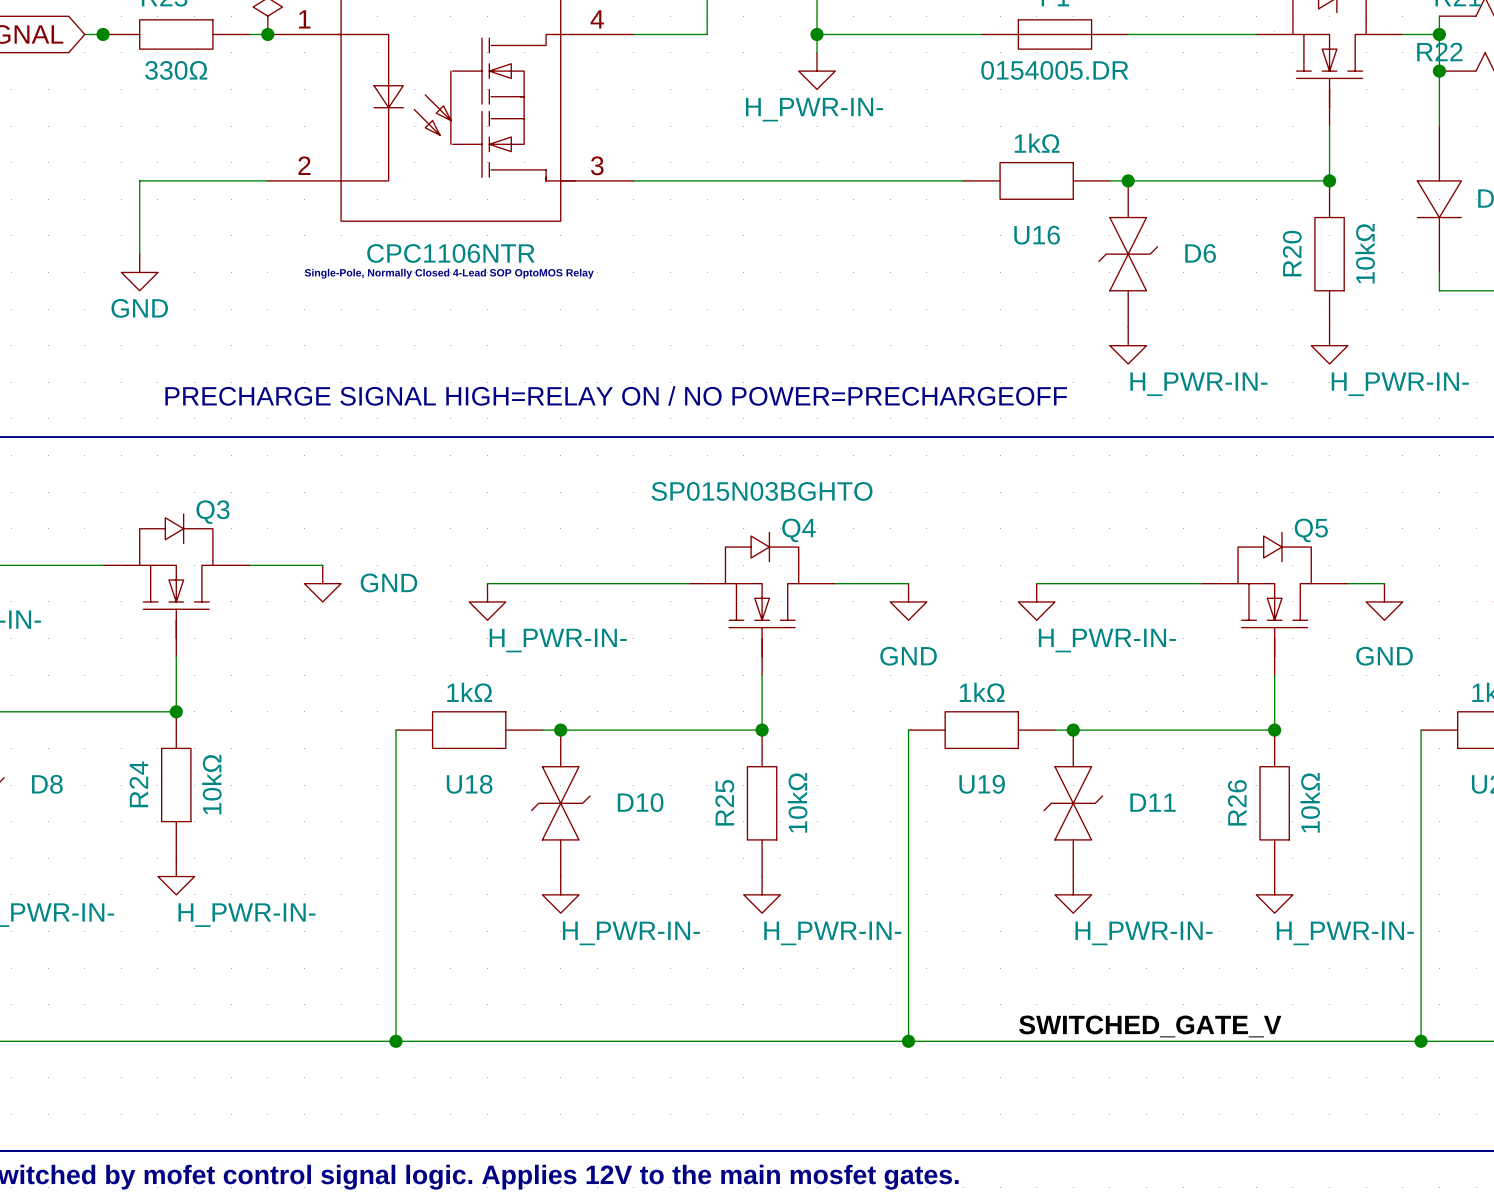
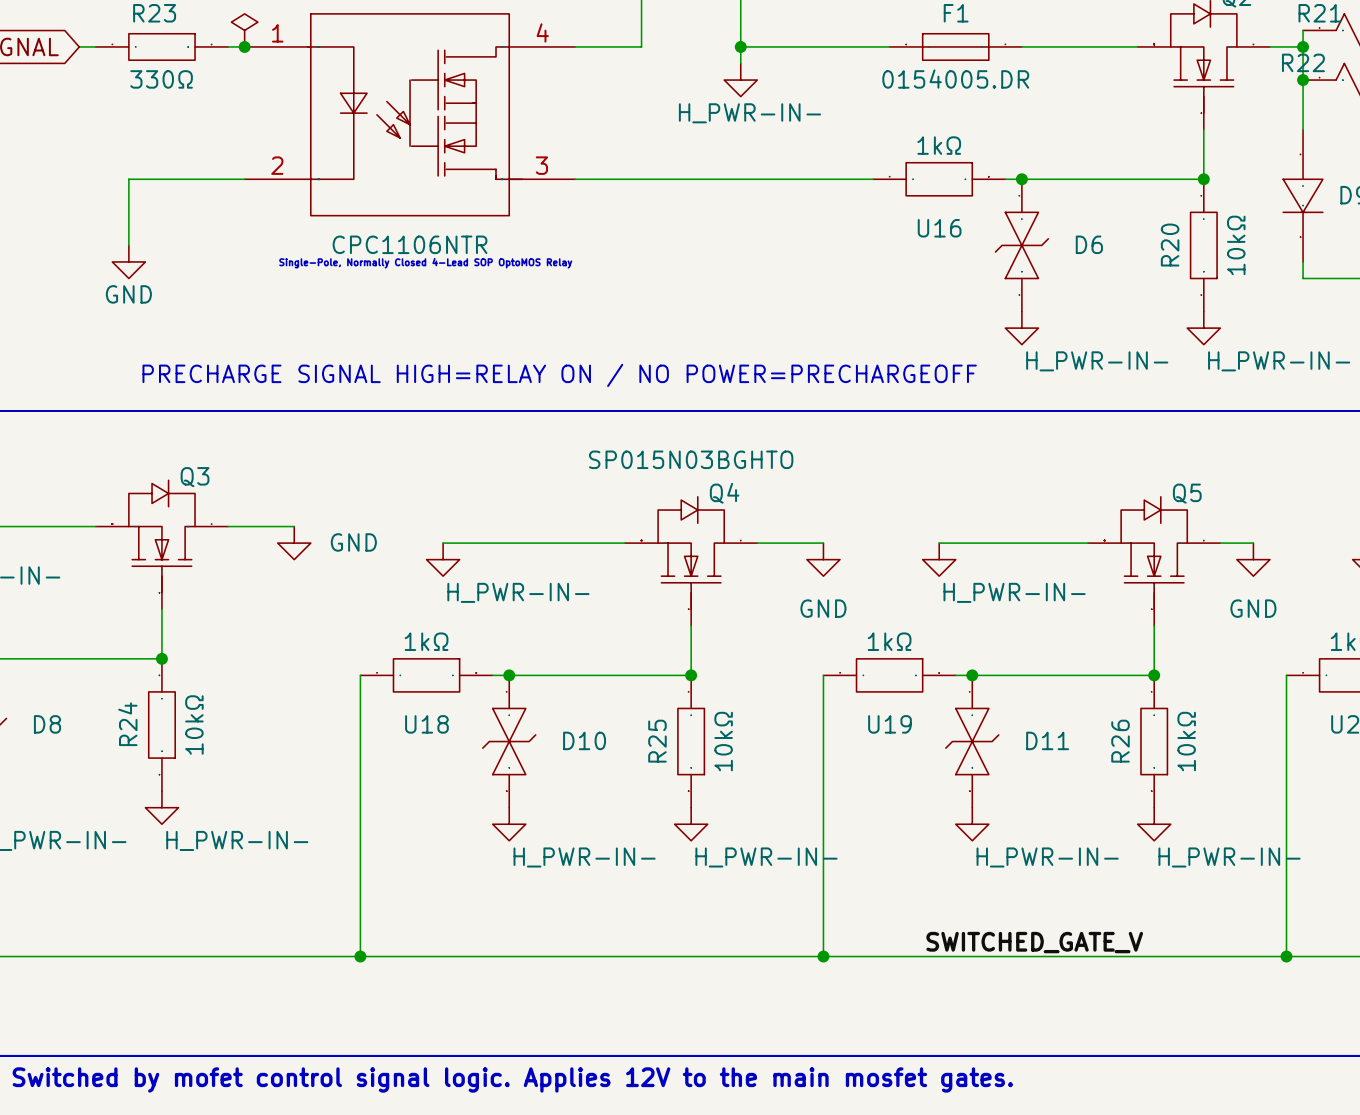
junction: (103, 34) -> none

